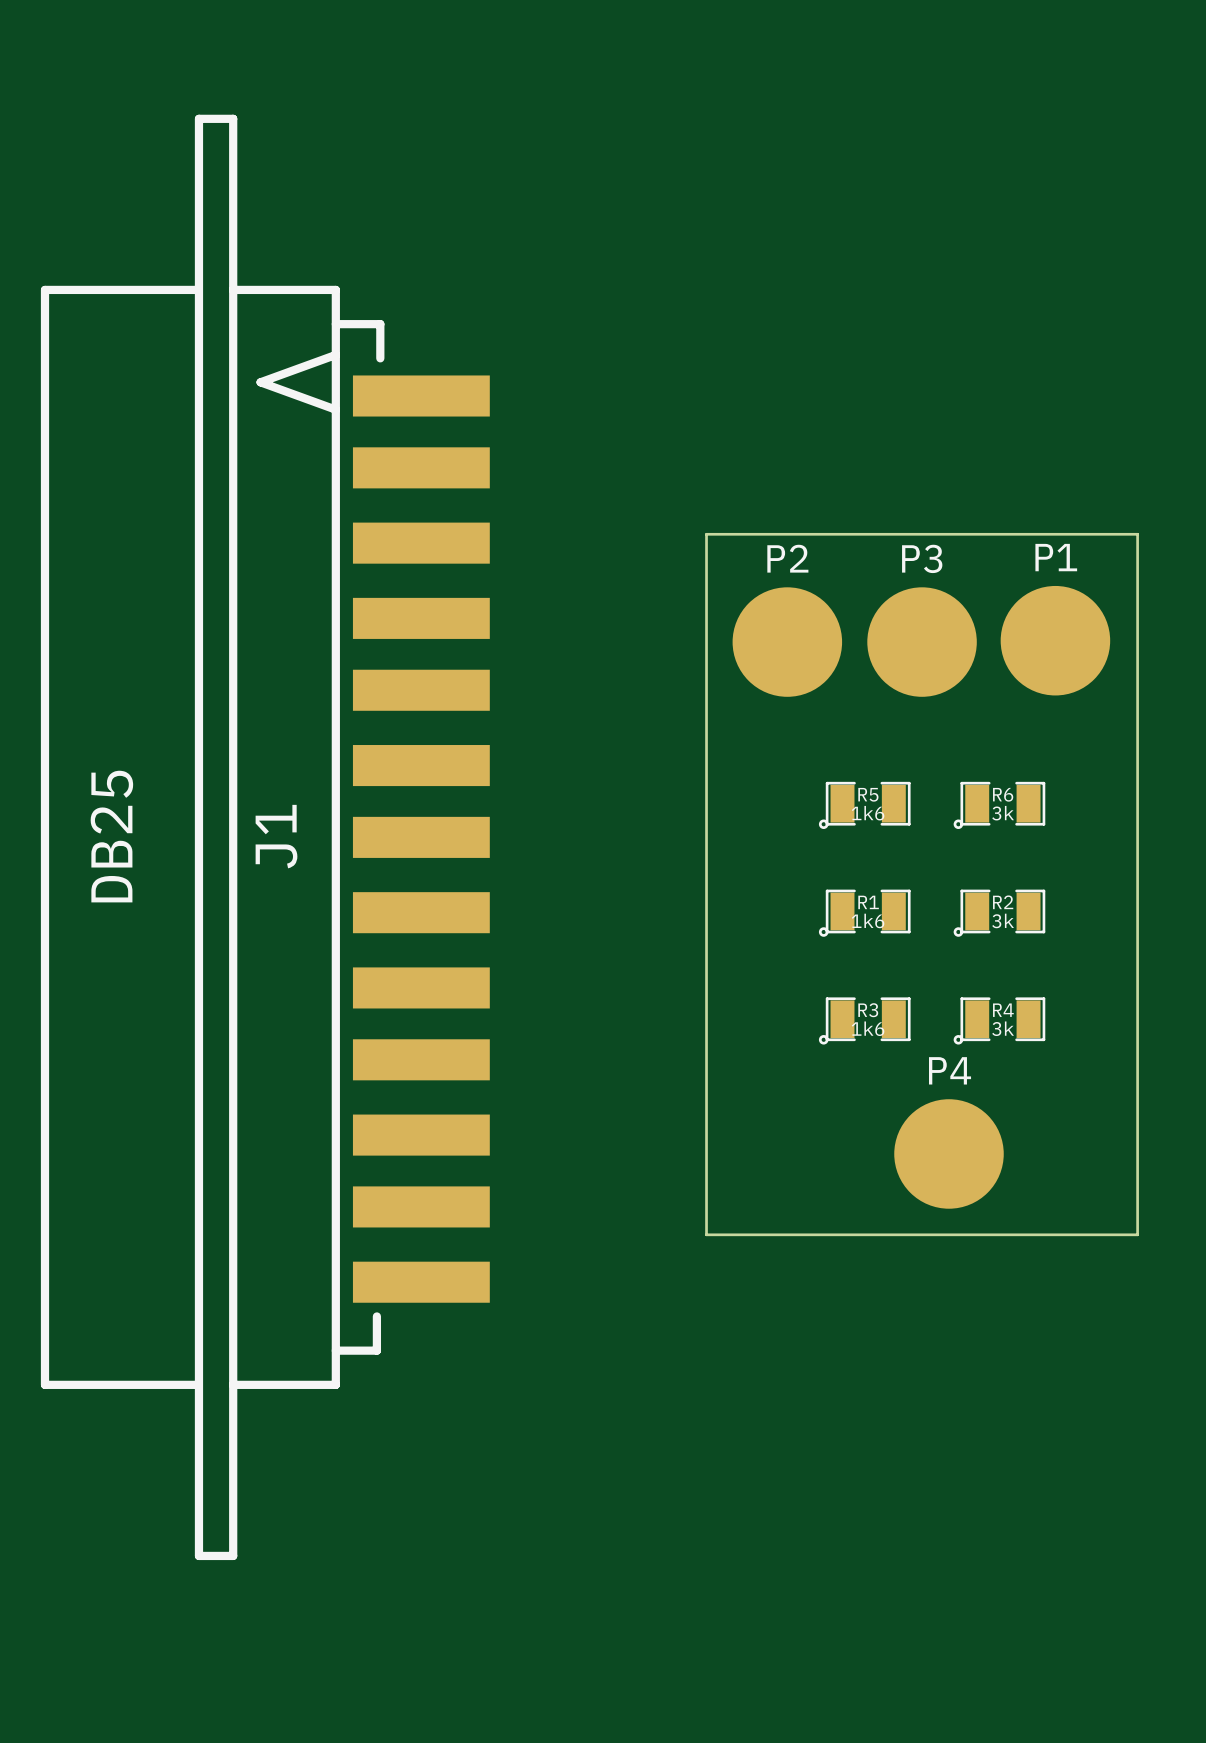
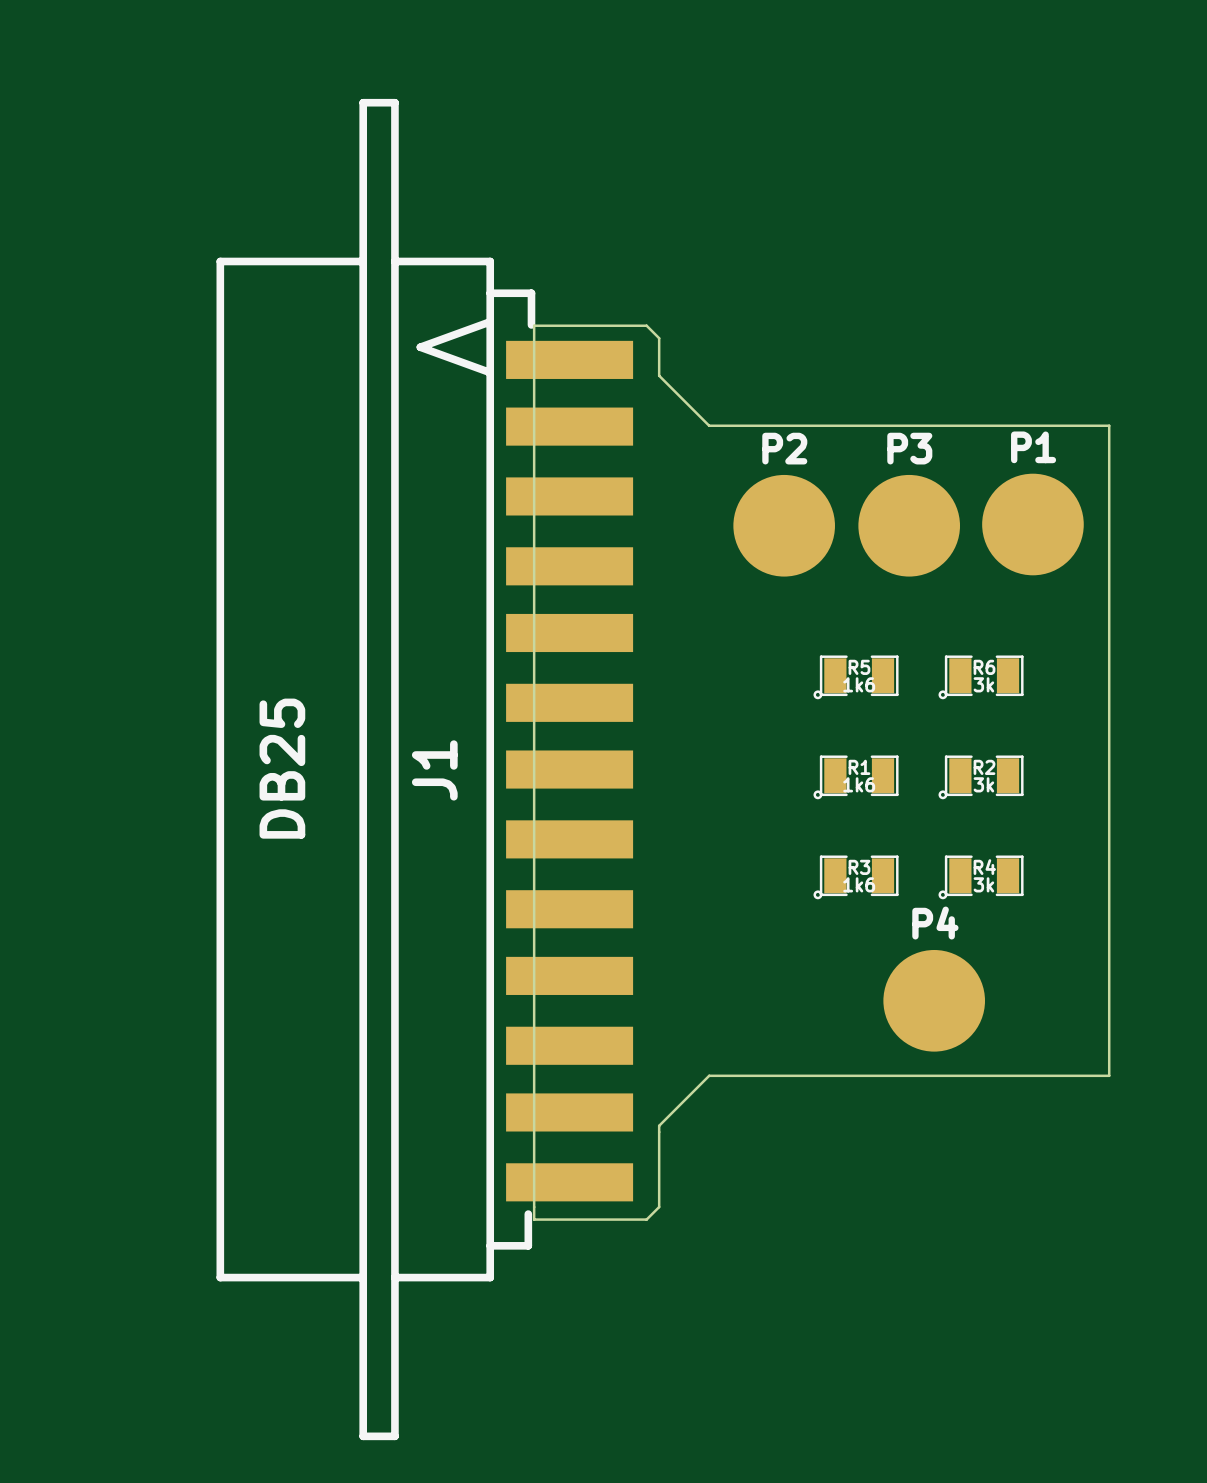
board edge: (706, 534) (706, 1234) -> (709, 425) (659, 375) (659, 338) (646, 325) (534, 325) (534, 1219) (646, 1219) (659, 1207) (659, 1125) (709, 1075)
J1 position: (265, 837) -> (424, 769)

